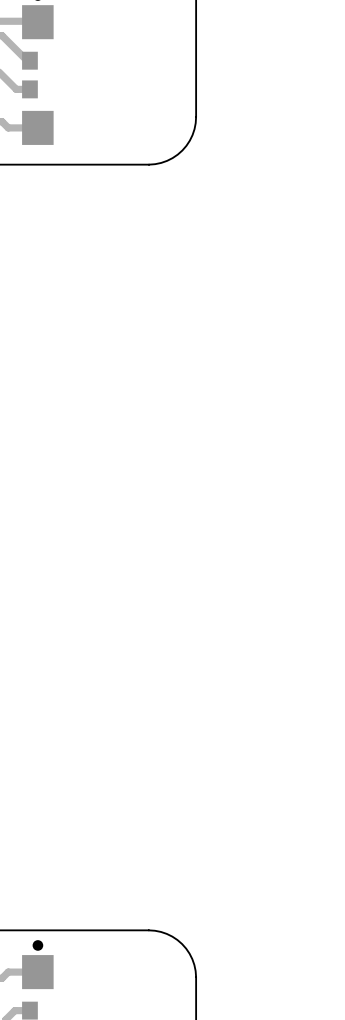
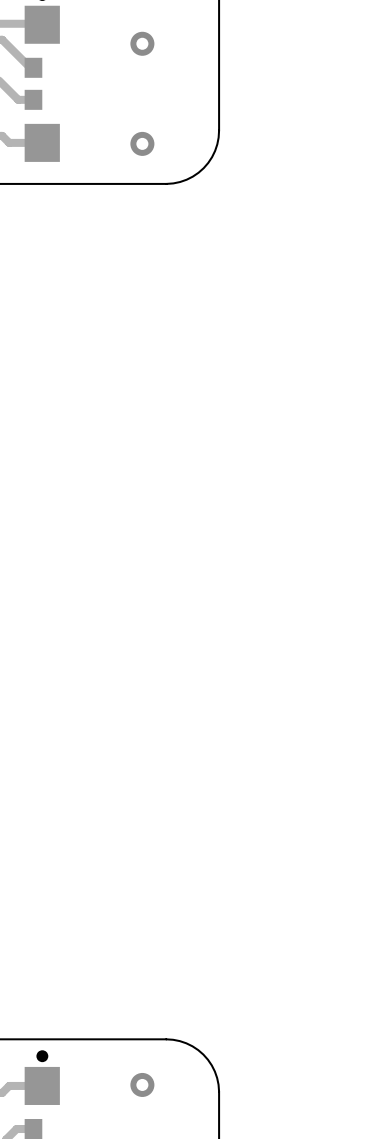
via: none -> (142, 43)
via: none -> (142, 143)
via: none -> (142, 1084)

